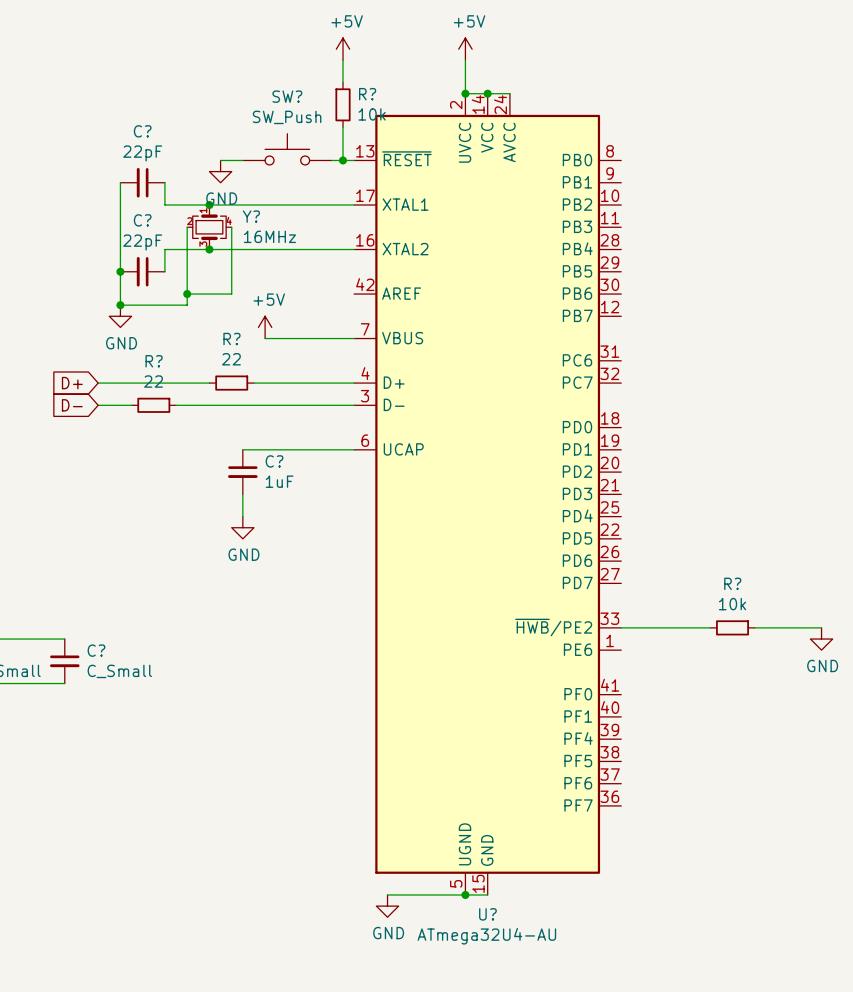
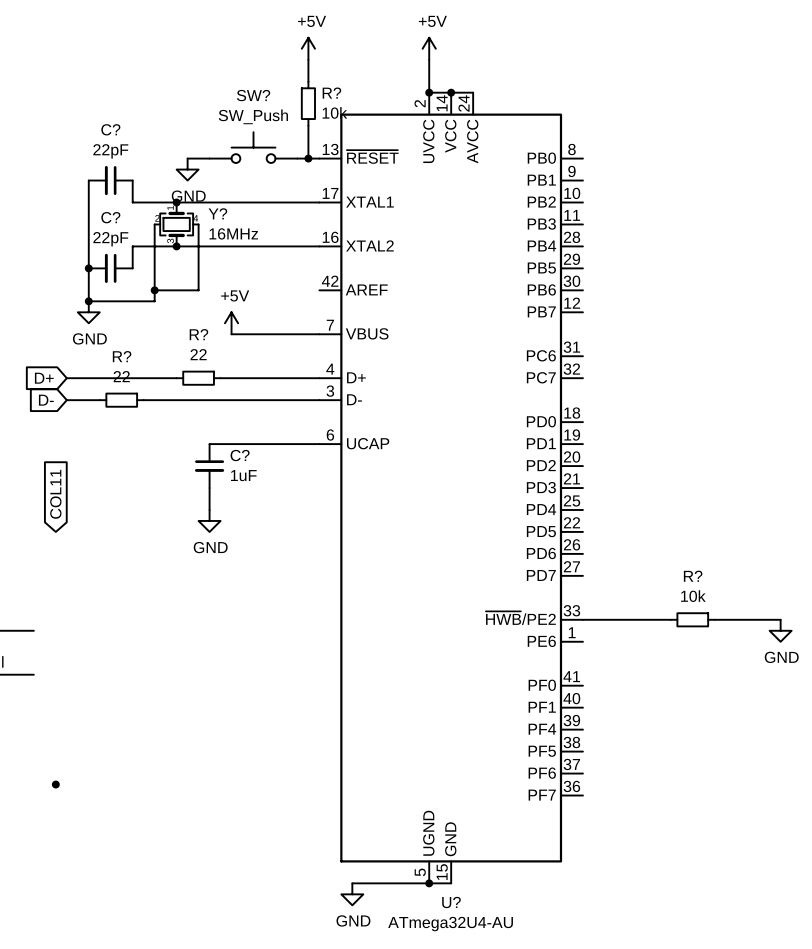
global label: none -> COL11 (55, 494)
C?: C_Small (64, 661) -> none
junction: none -> (55, 784)

